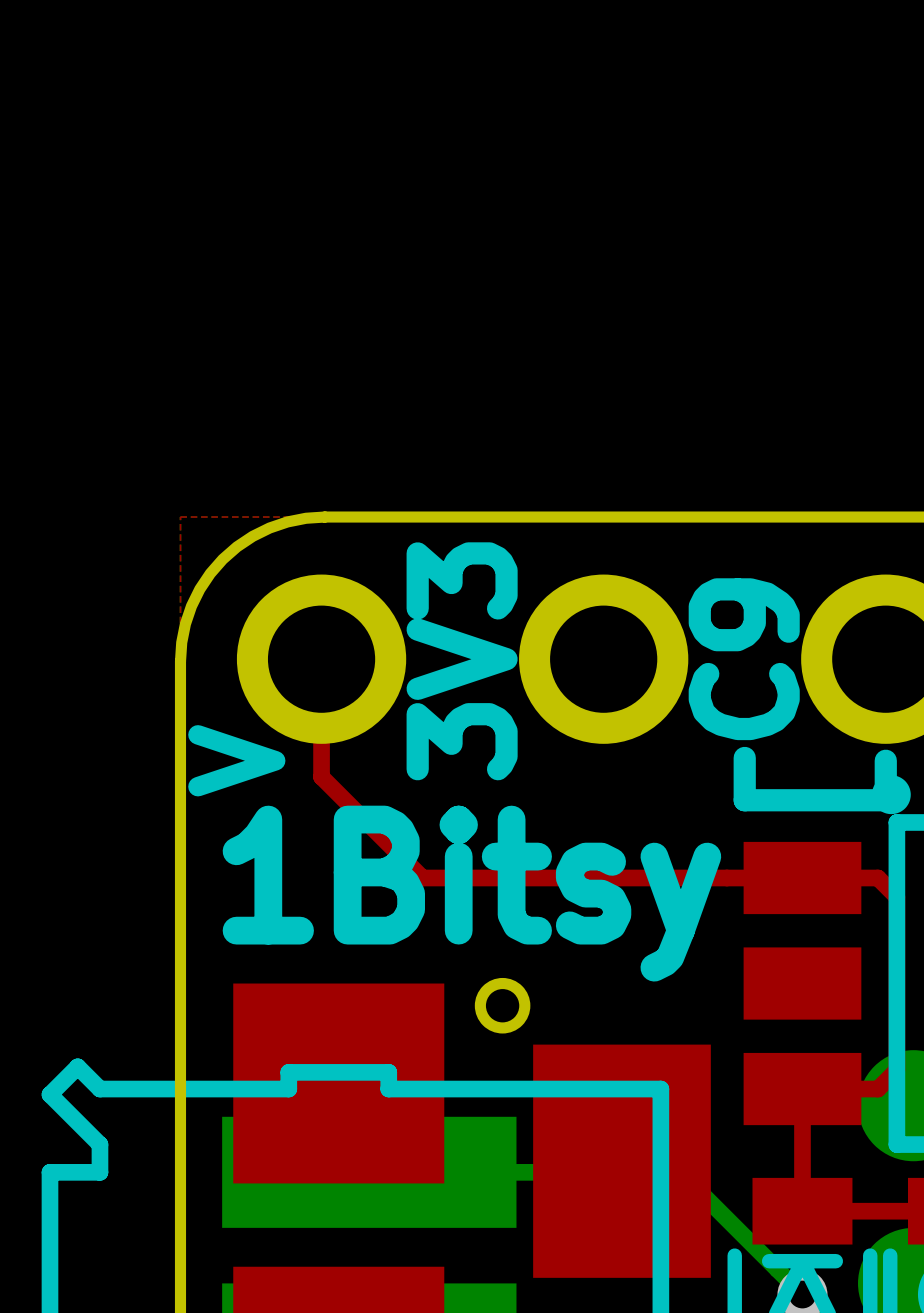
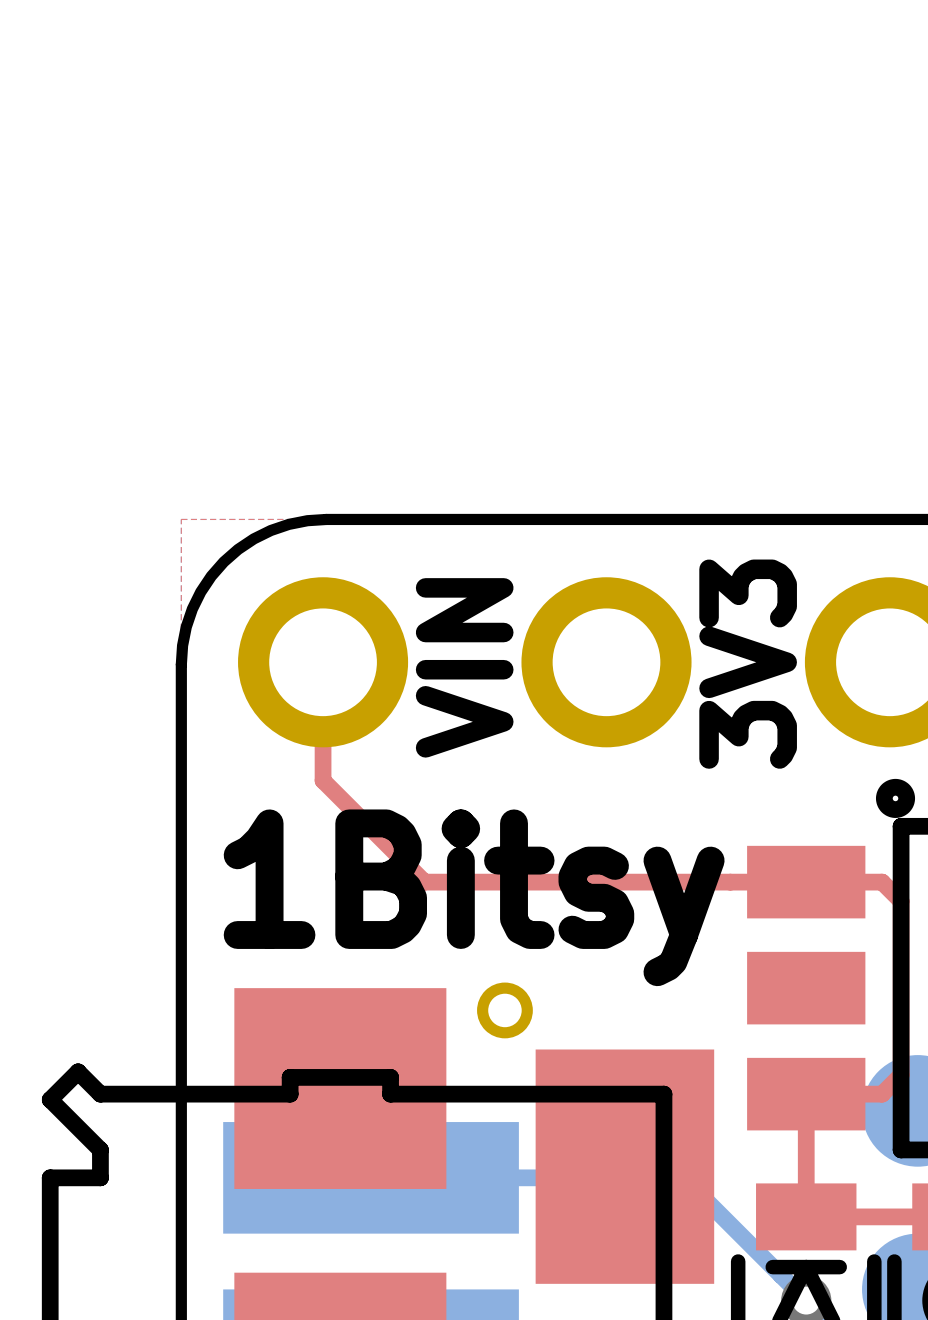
text: C9 (744, 659) -> 3V3 (748, 664)
text: 3V3 (462, 661) -> VIN (464, 667)
line: (744, 757) (744, 800) (885, 800) (885, 760) -> none
text: V (236, 760) -> none

